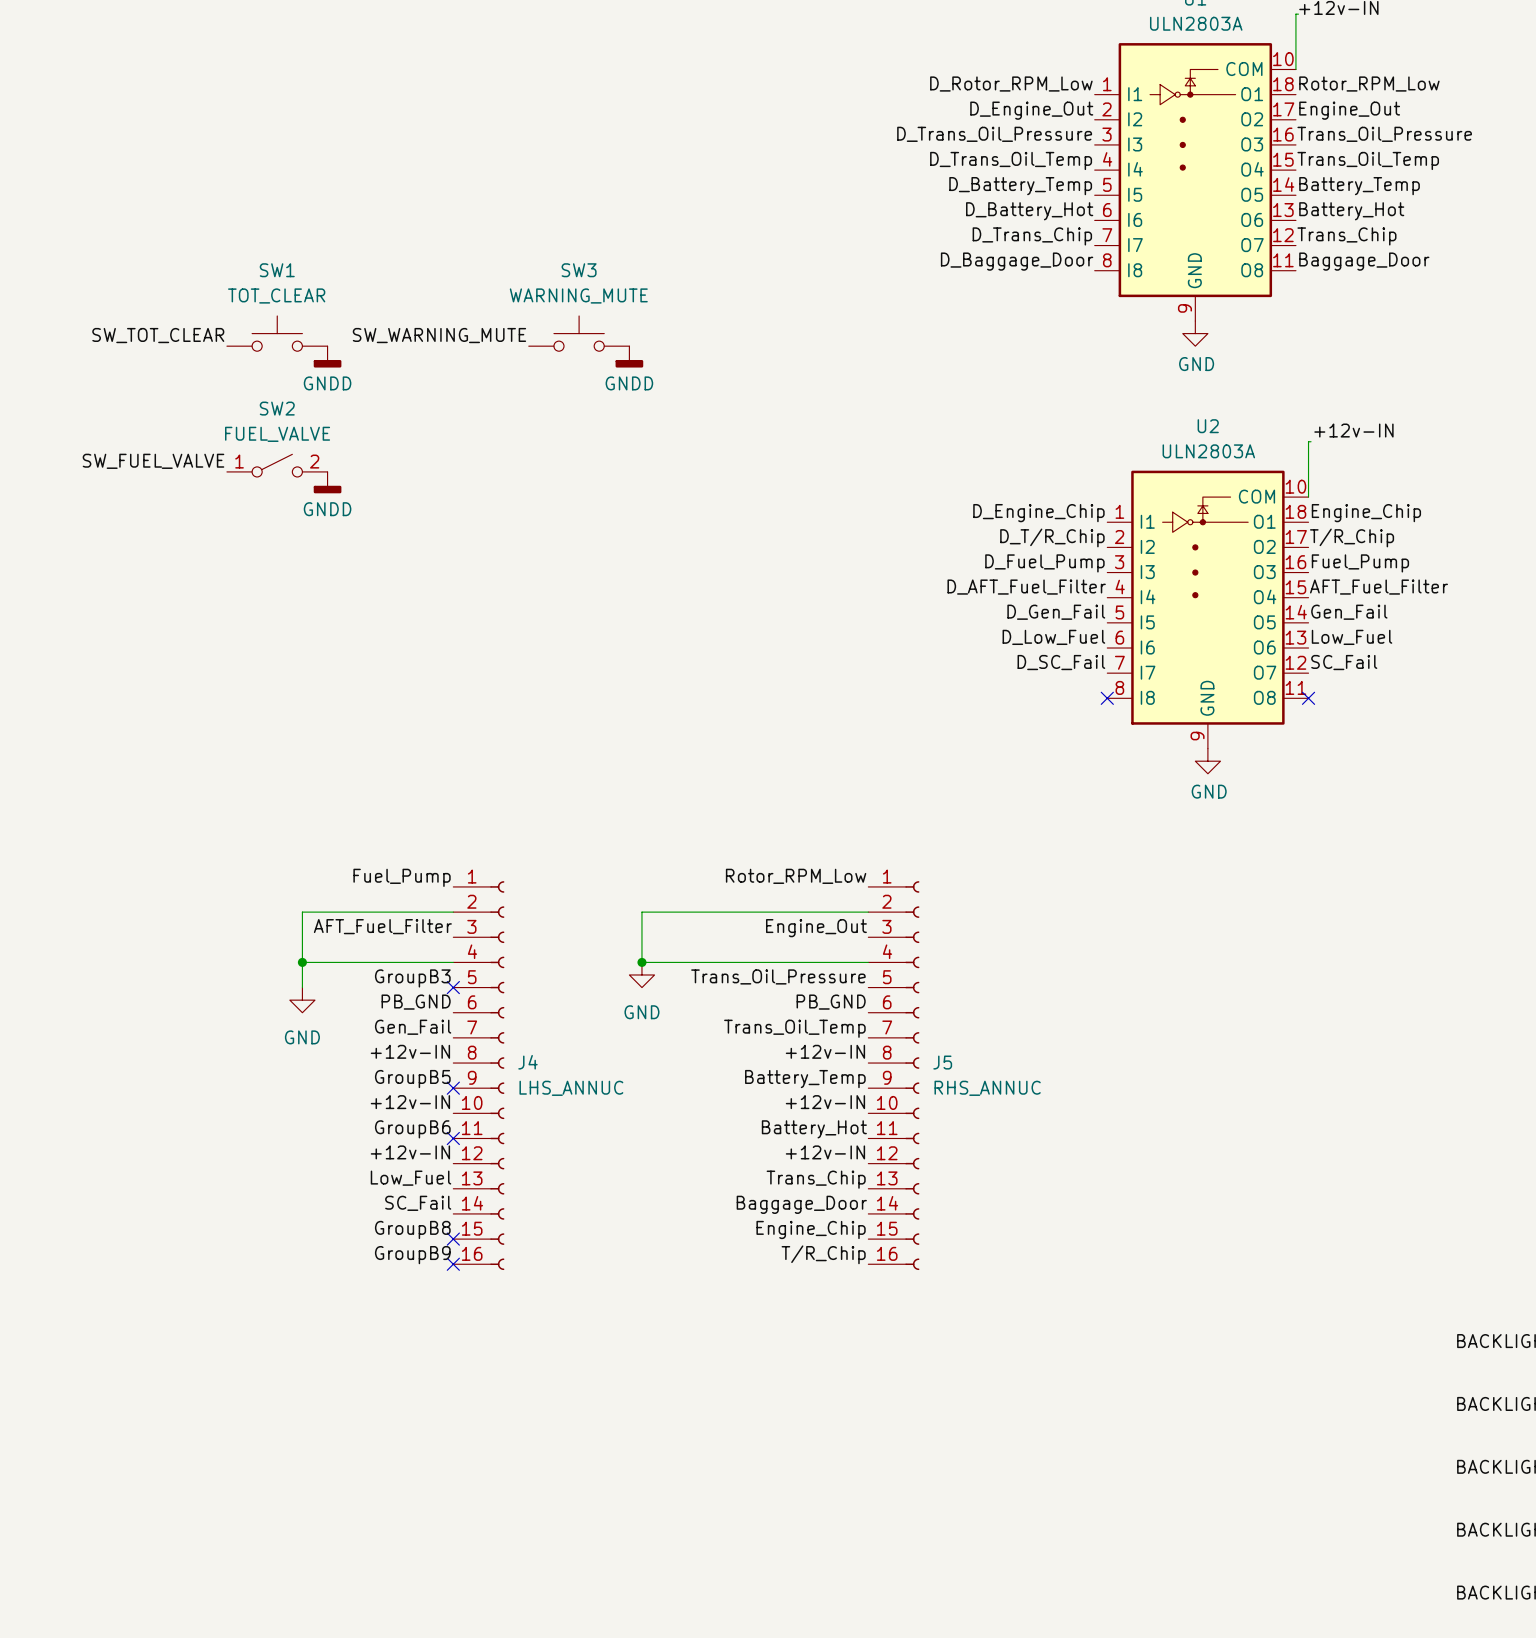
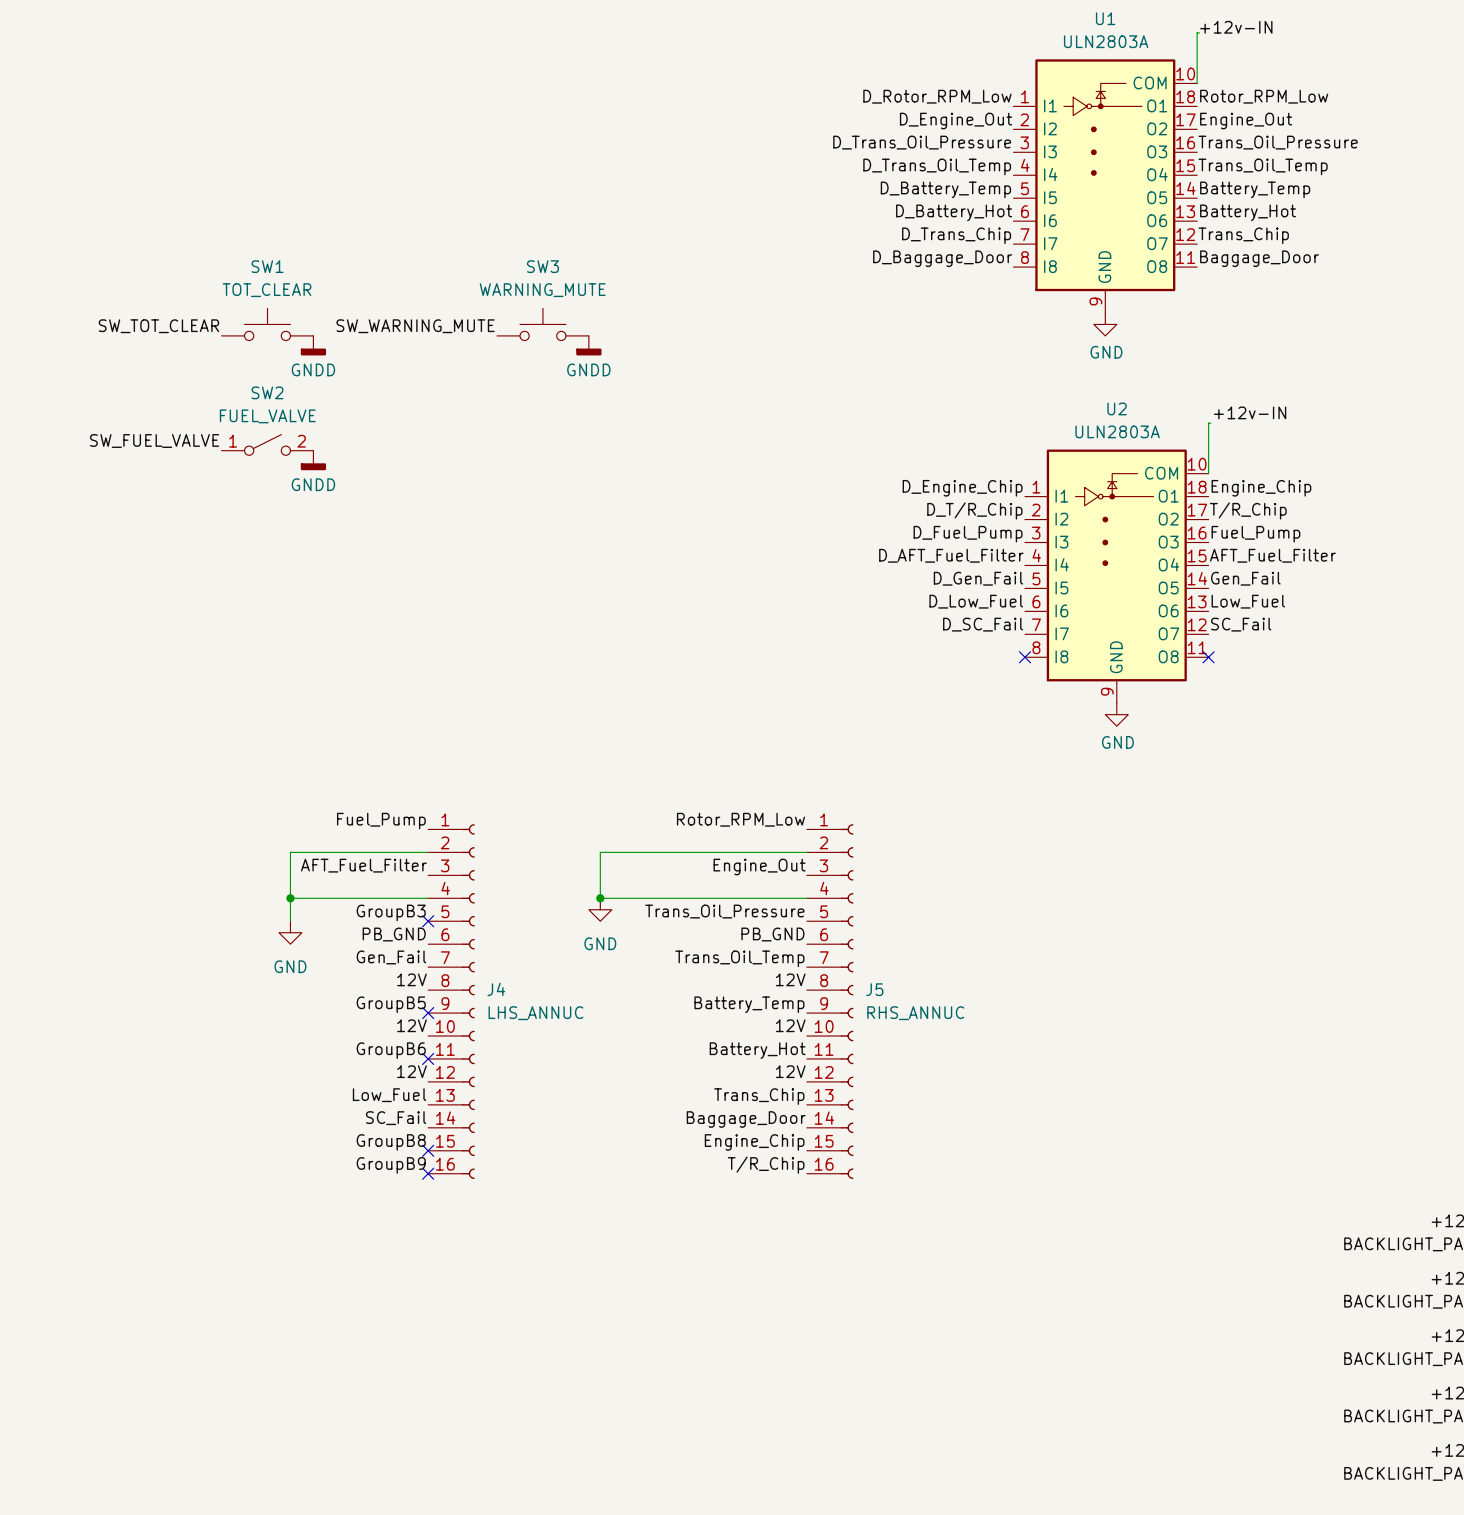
label: +12v-IN (410, 1051) -> 12V (411, 979)
label: +12v-IN (825, 1051) -> 12V (790, 979)
label: +12v-IN (410, 1102) -> 12V (411, 1025)
label: +12v-IN (825, 1102) -> 12V (790, 1025)
label: +12v-IN (410, 1152) -> 12V (411, 1071)
label: +12v-IN (825, 1152) -> 12V (790, 1071)

